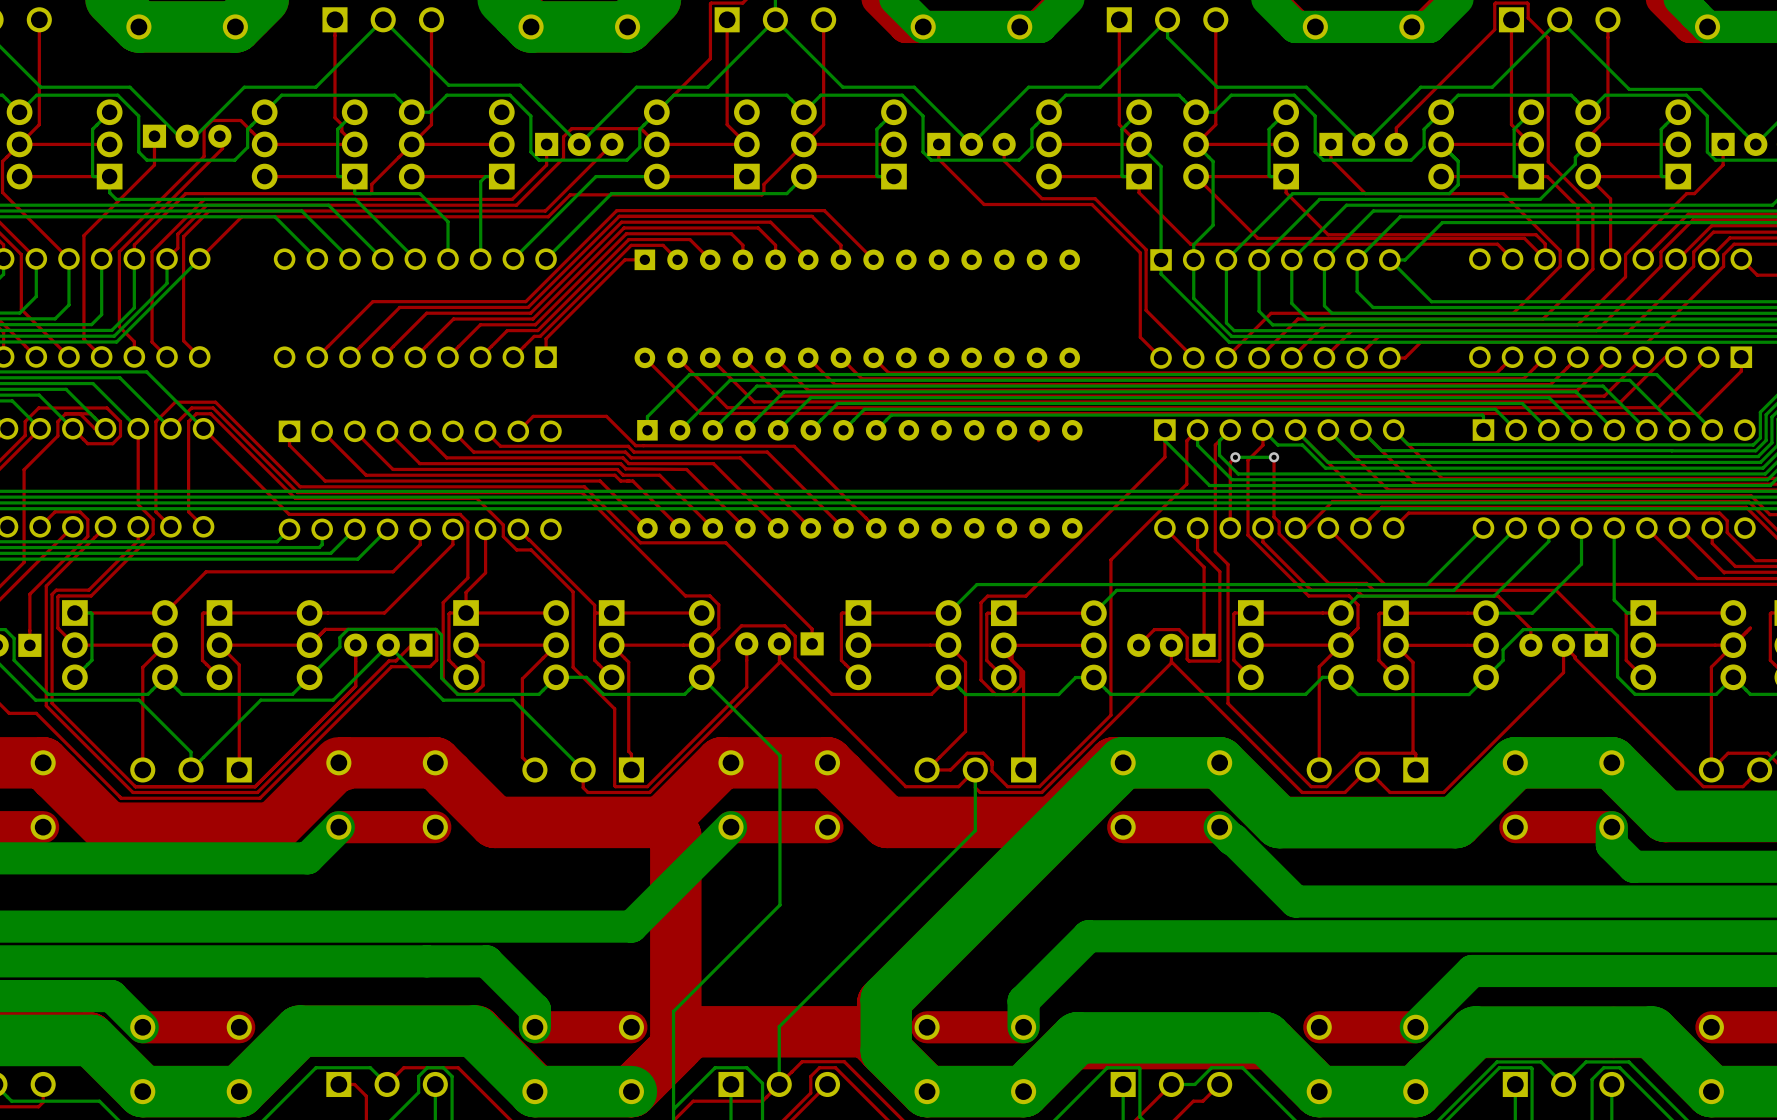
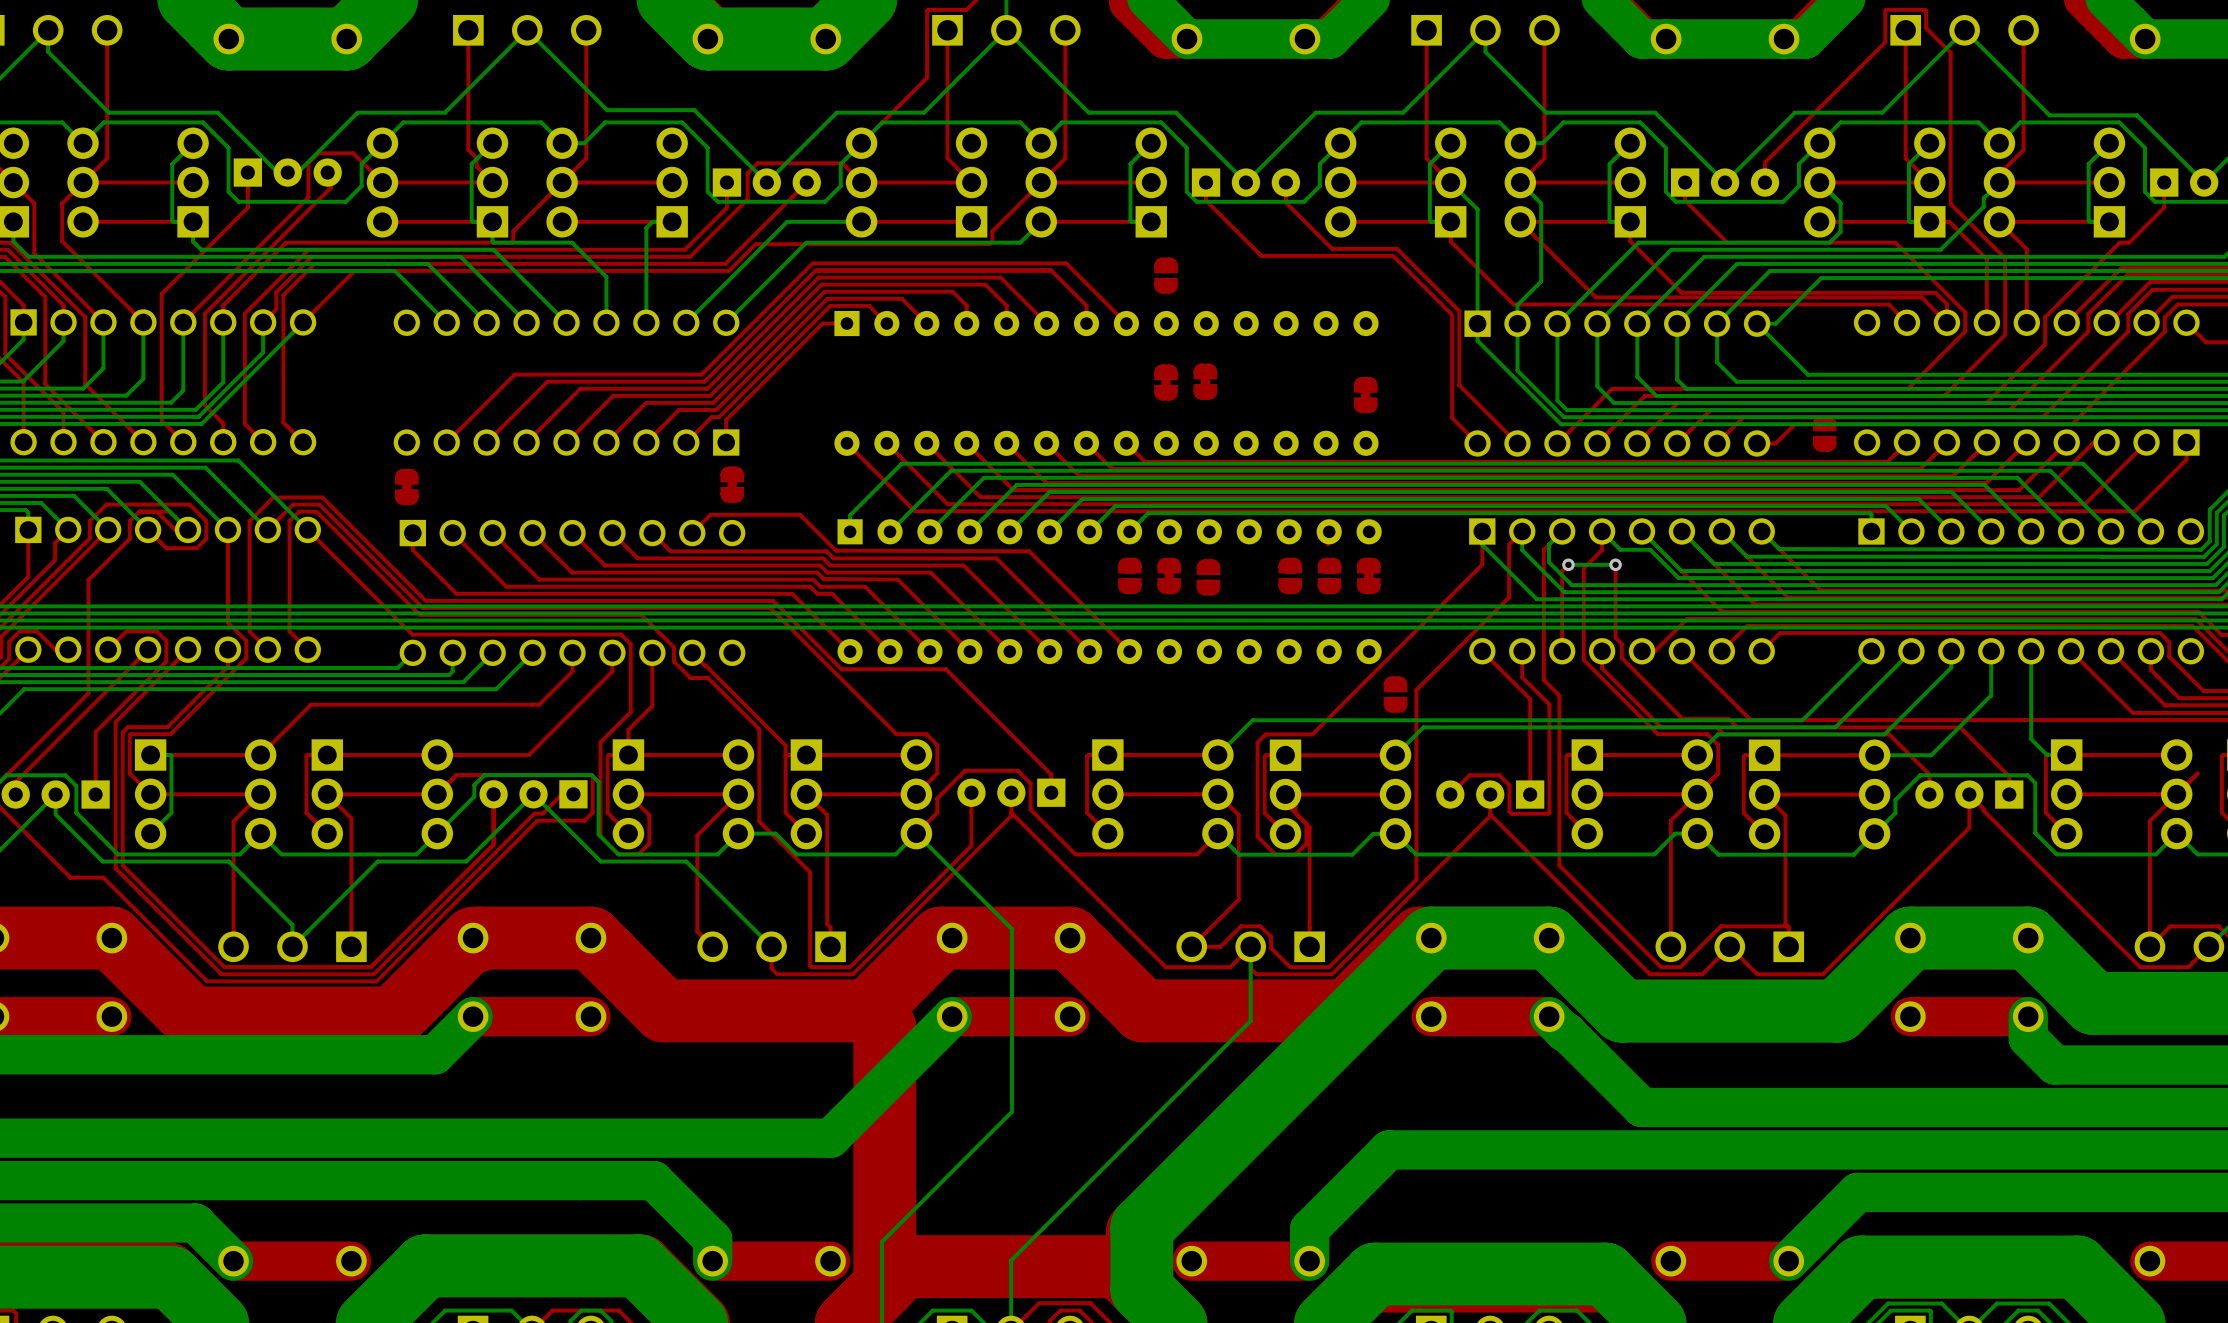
part: none -> (1166, 275)
part: none -> (1205, 381)
part: none -> (1166, 382)
part: none -> (1365, 395)
part: none -> (1824, 433)
part: none -> (732, 484)
part: none -> (406, 487)
part: none -> (1129, 575)
part: none -> (1169, 575)
part: none -> (1290, 575)
part: none -> (1329, 575)
part: none -> (1368, 575)
part: none -> (1208, 577)
part: none -> (1395, 694)

